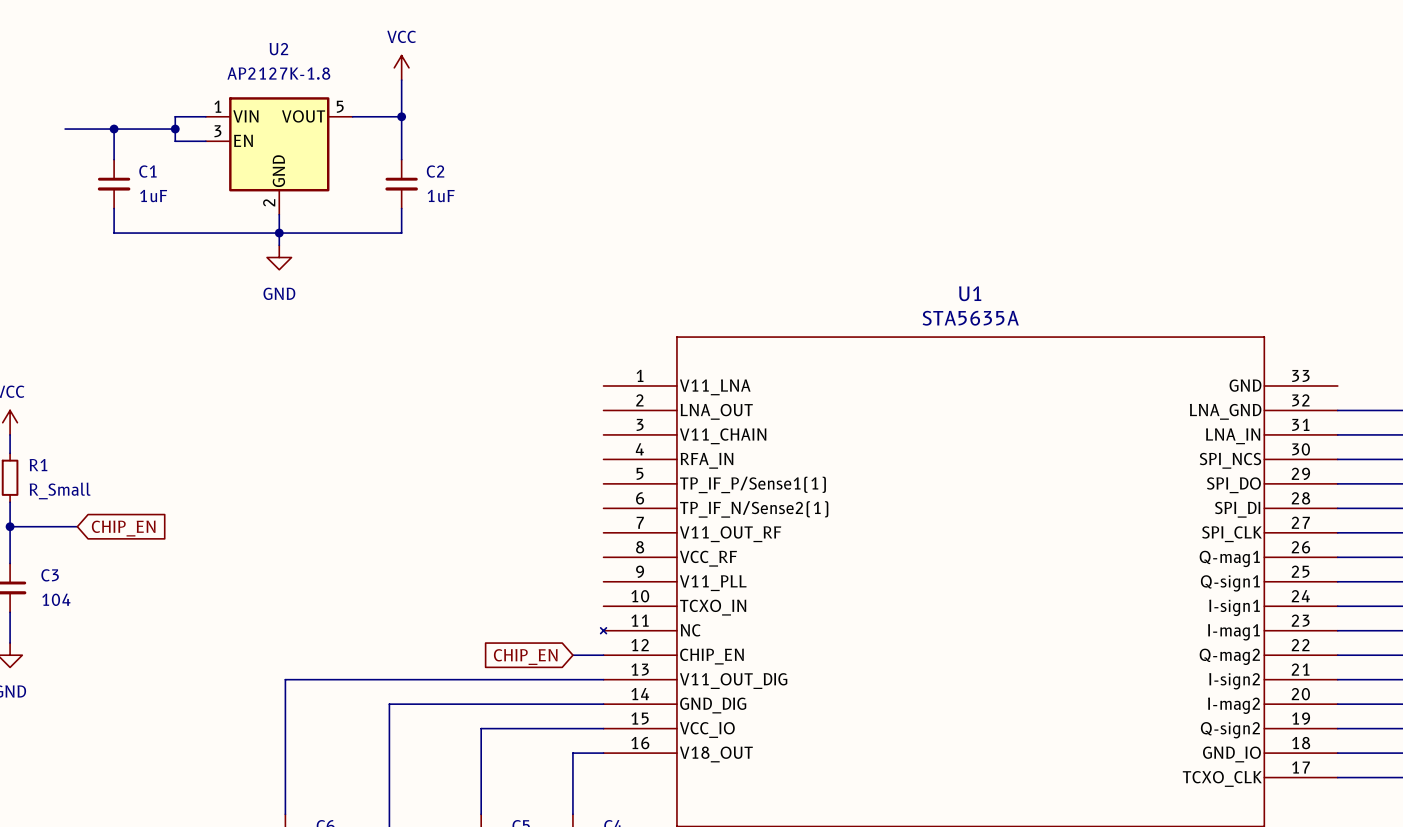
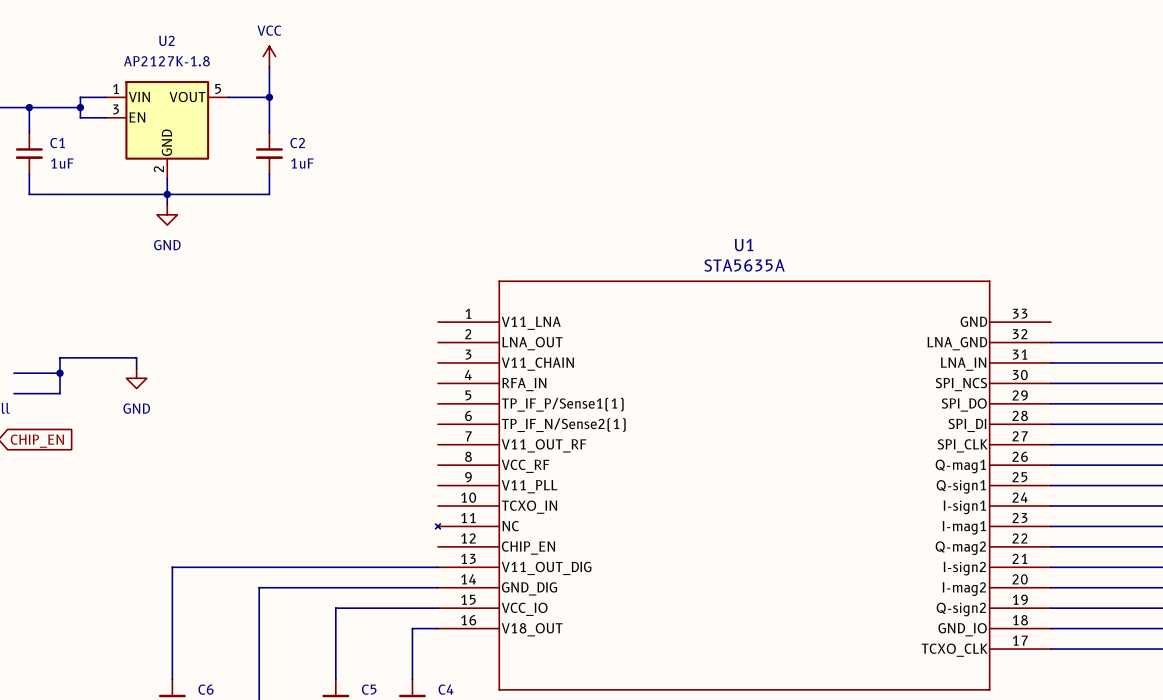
wire: none -> (136, 368) (136, 357) (59, 357) (59, 393) (14, 393)
wire: none -> (14, 373) (59, 373)
junction: none -> (59, 373)
power symbol: none -> GND (136, 378)
wire: (572, 655) (603, 655) -> none
global label: CHIP_EN (525, 657) -> none

